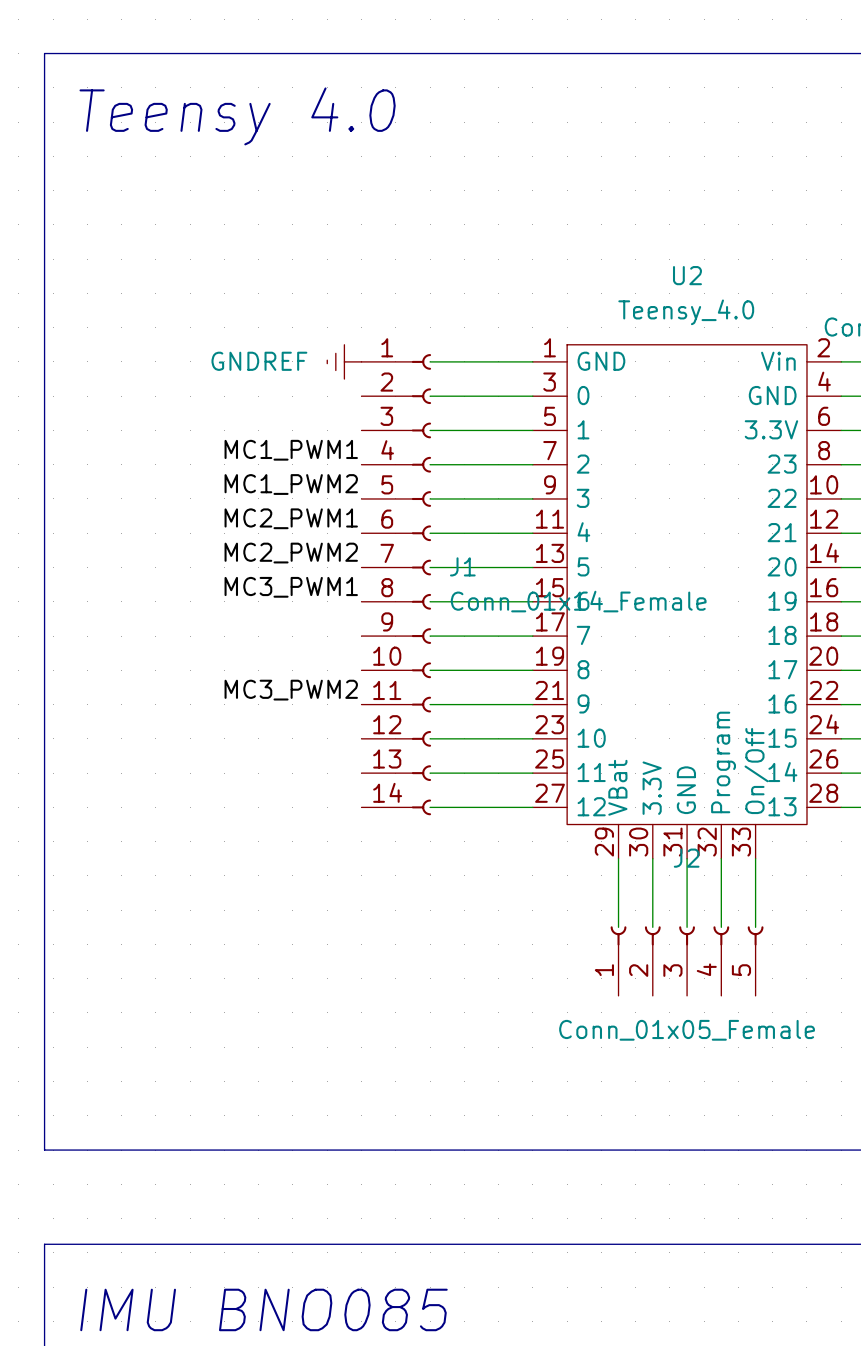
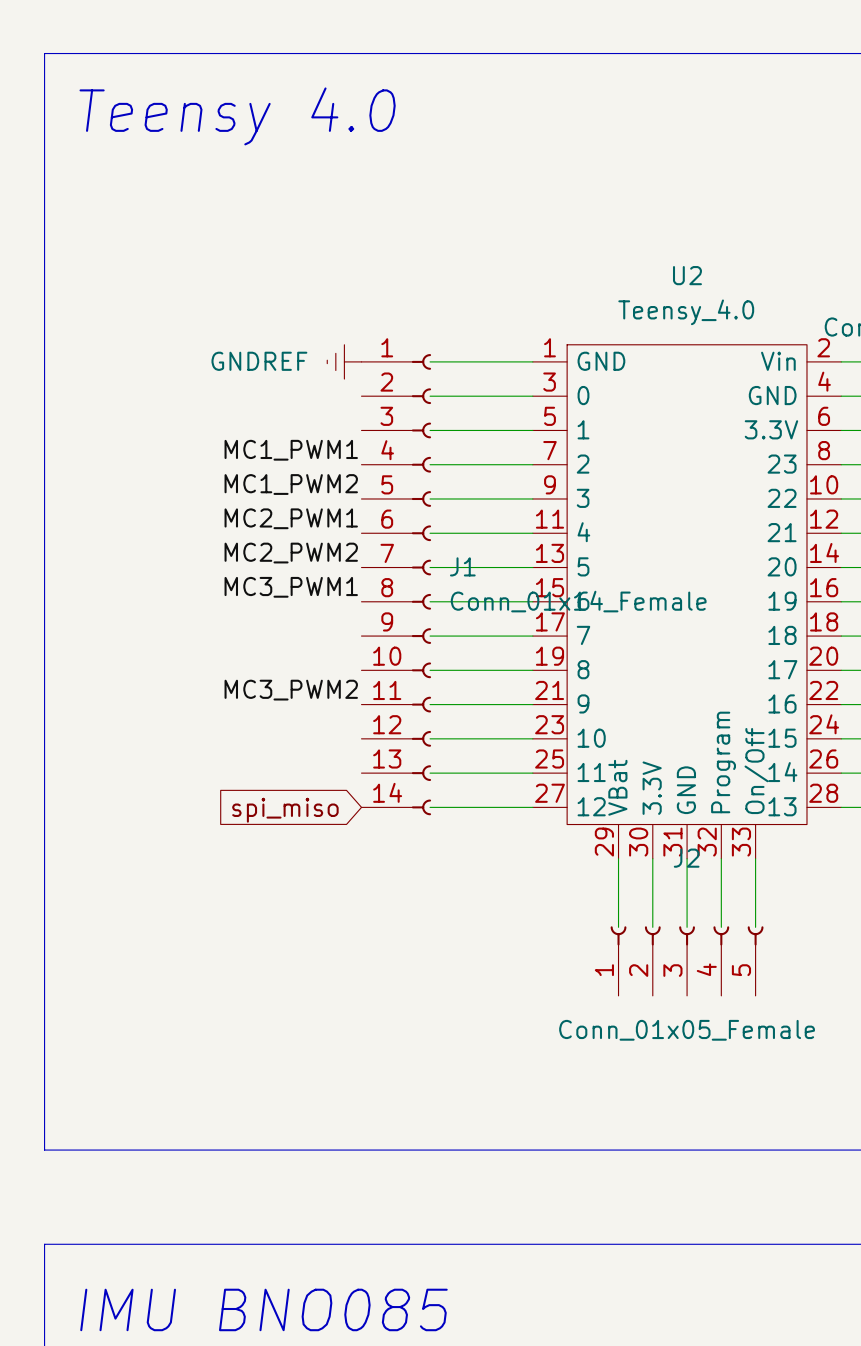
global label: none -> spi_miso (285, 810)

